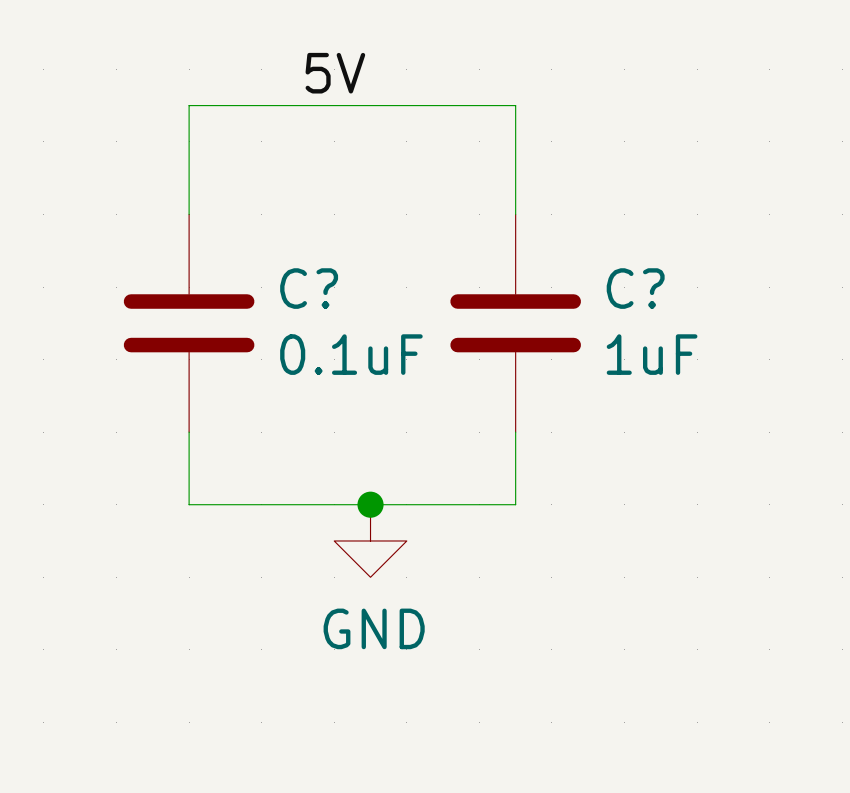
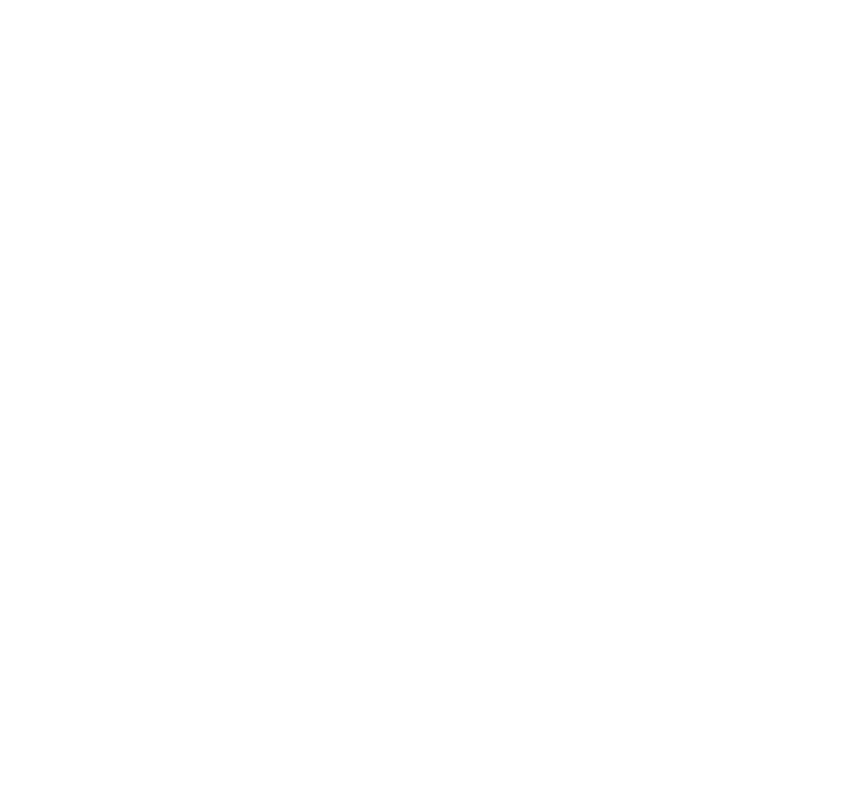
label: 5V (335, 73) -> none
wire: (189, 214) (189, 105) (515, 105) (515, 214) -> none
C?: 0.1uF (189, 323) -> none
C?: 1uF (515, 323) -> none
wire: (189, 432) (189, 504) (515, 504) (515, 432) -> none
junction: (370, 504) -> none
power symbol: GND (370, 540) -> none

